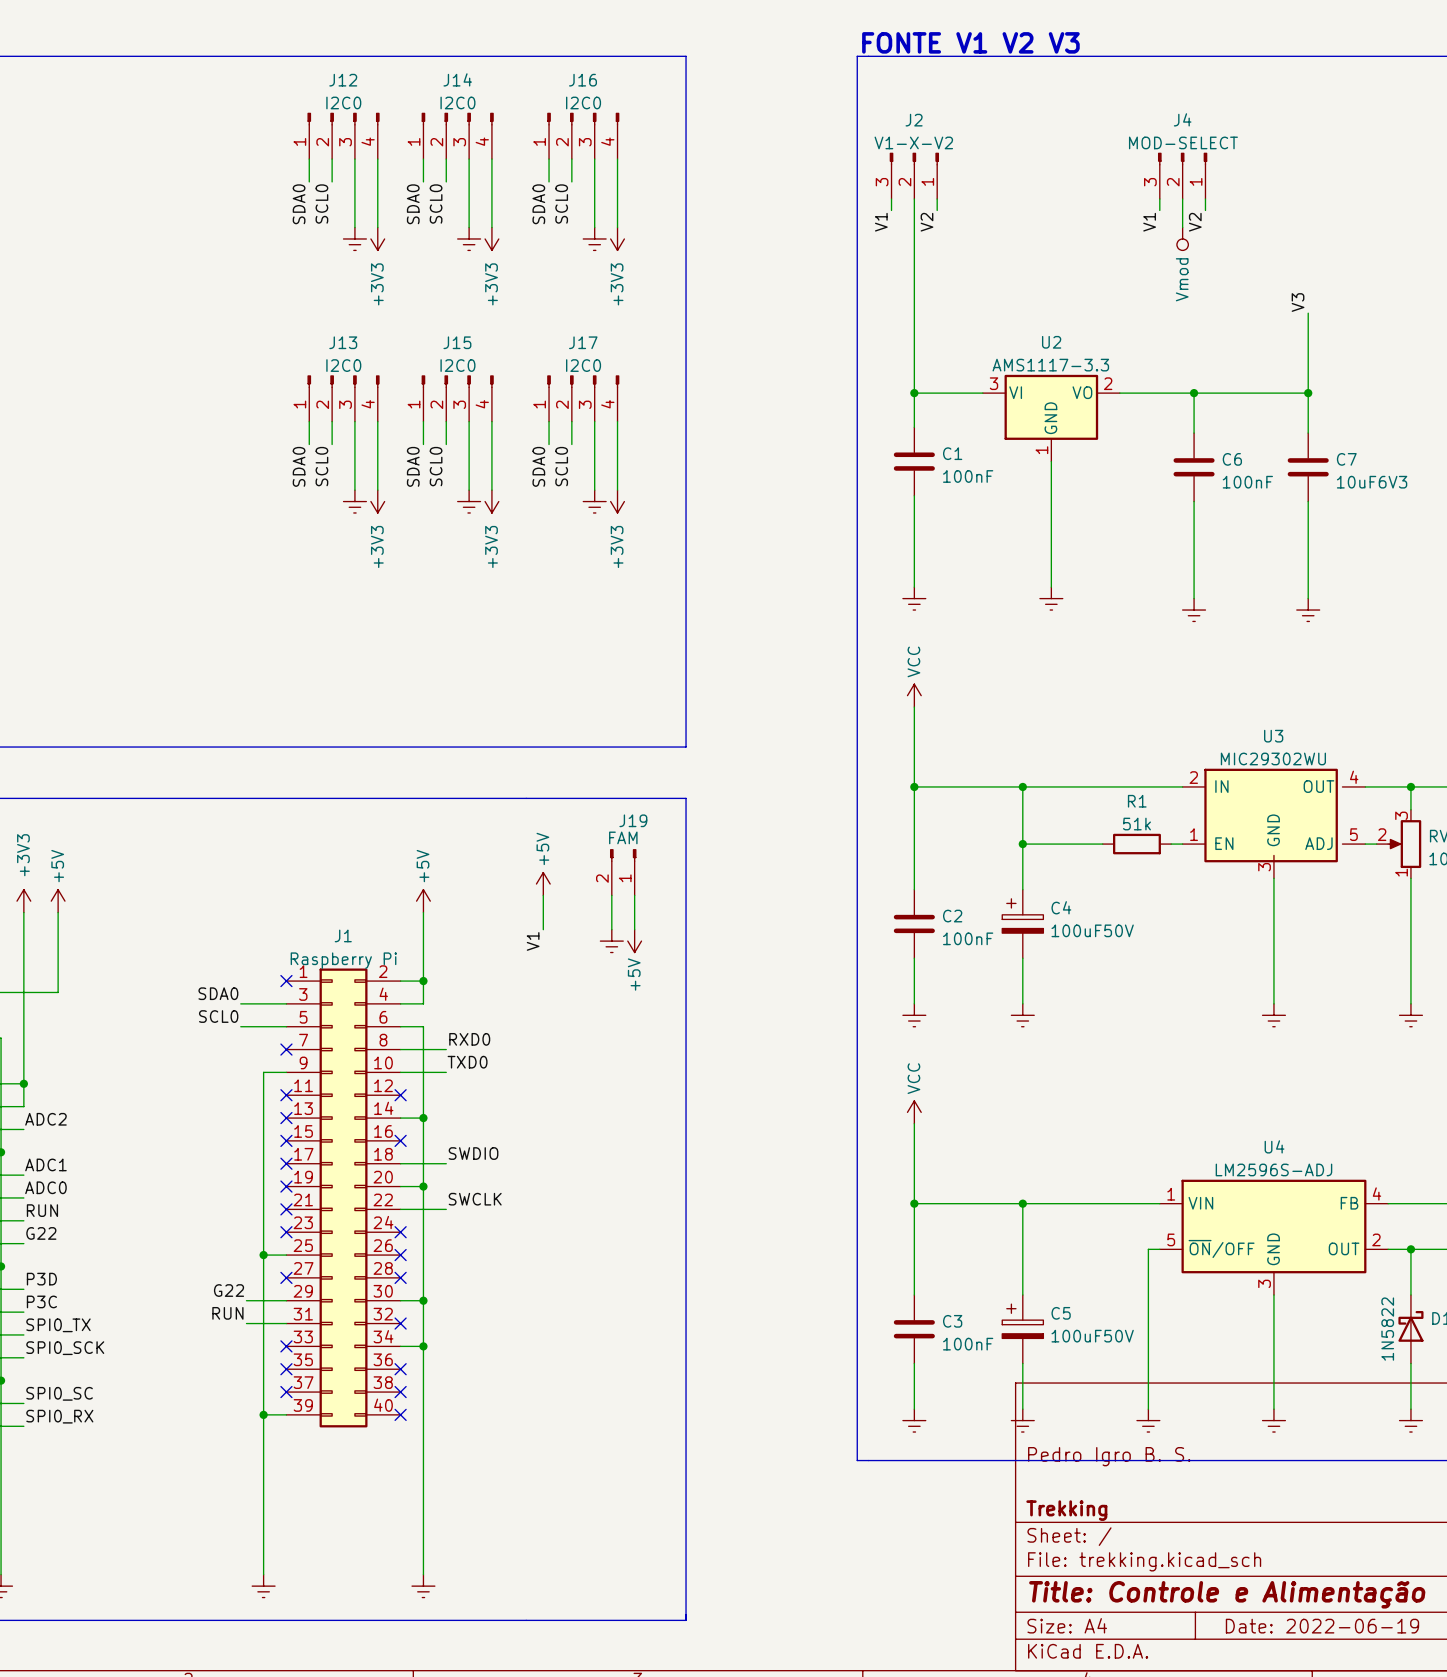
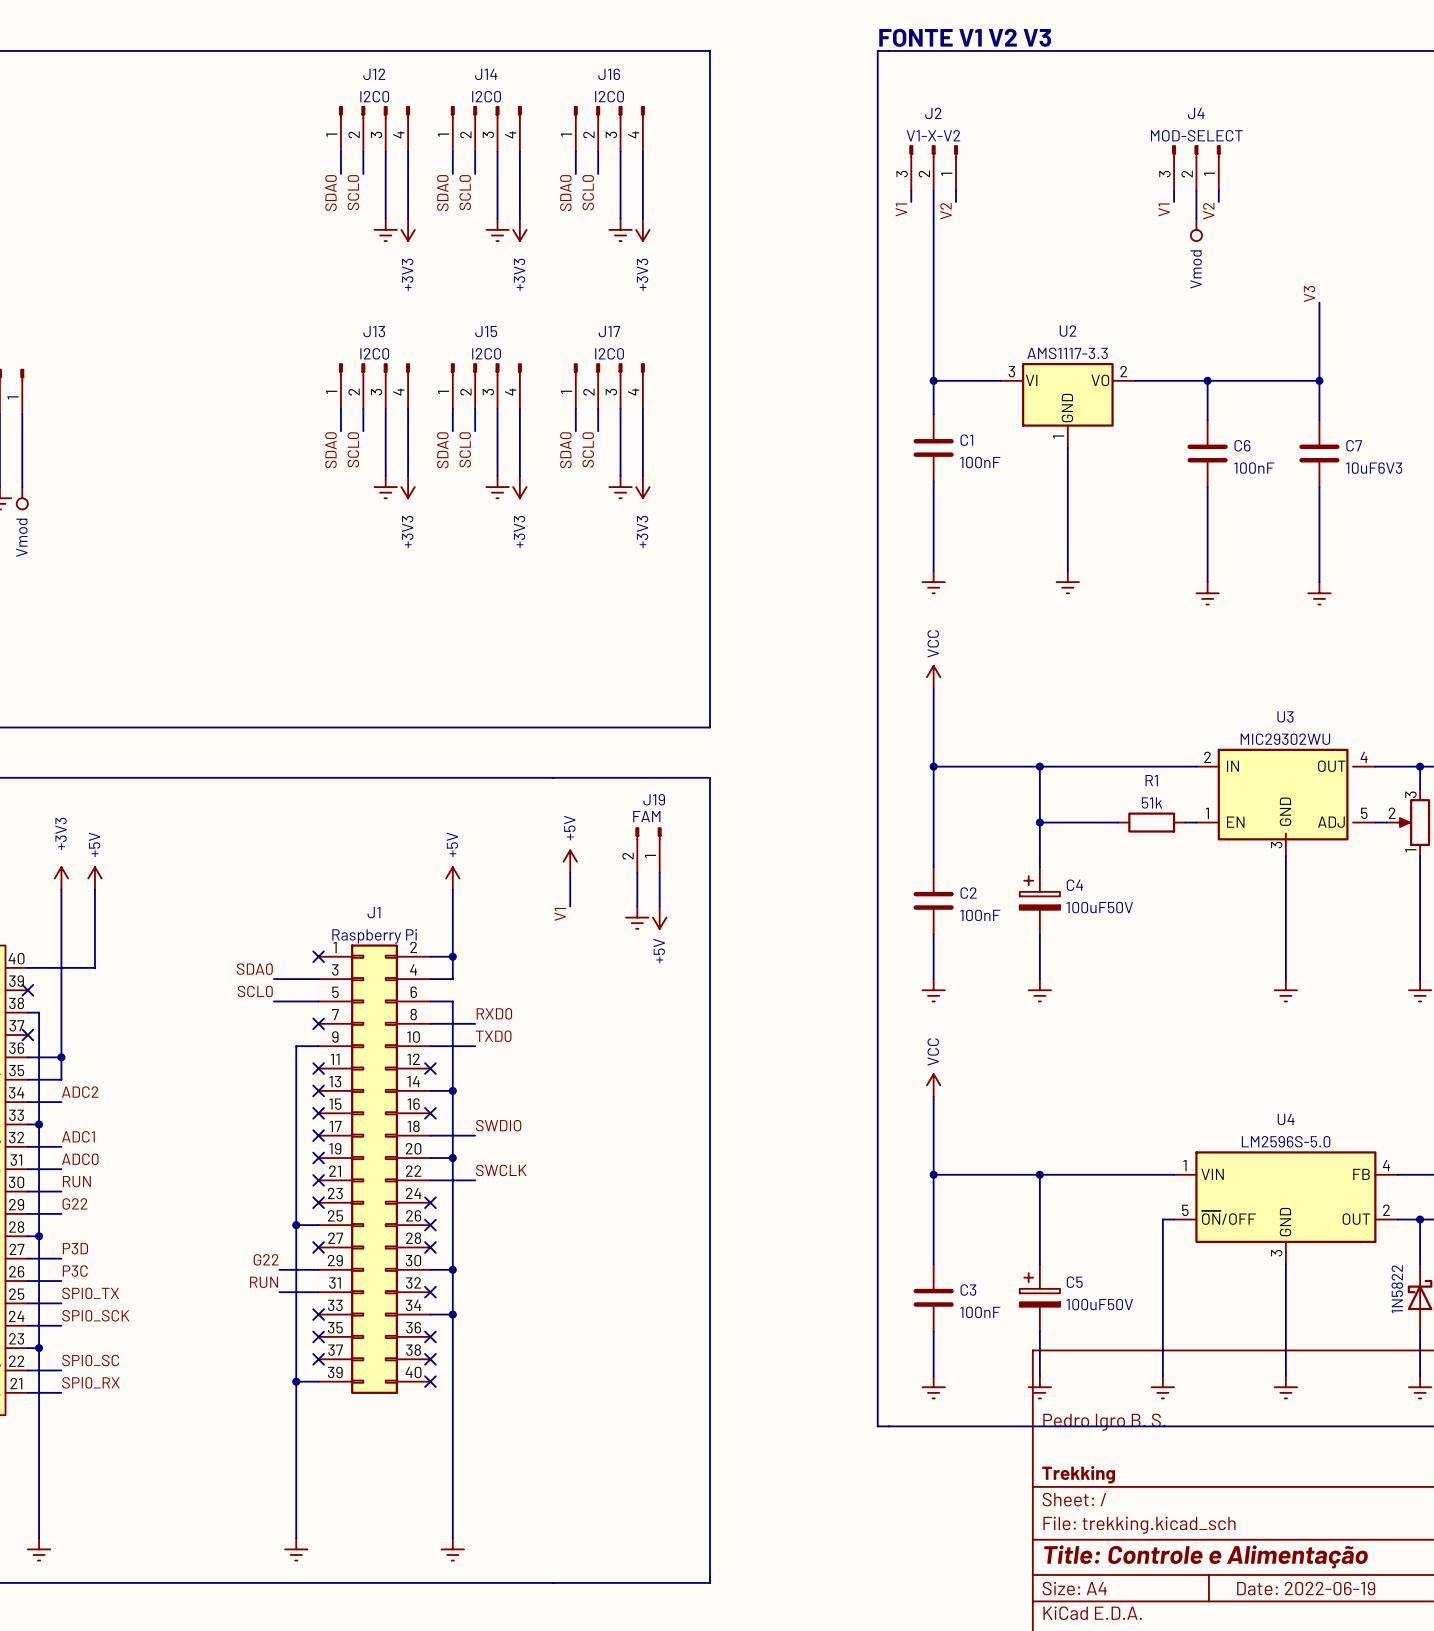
U4 value: LM2596S-ADJ (1273, 1169) -> LM2596S-5.0 (1286, 1141)

